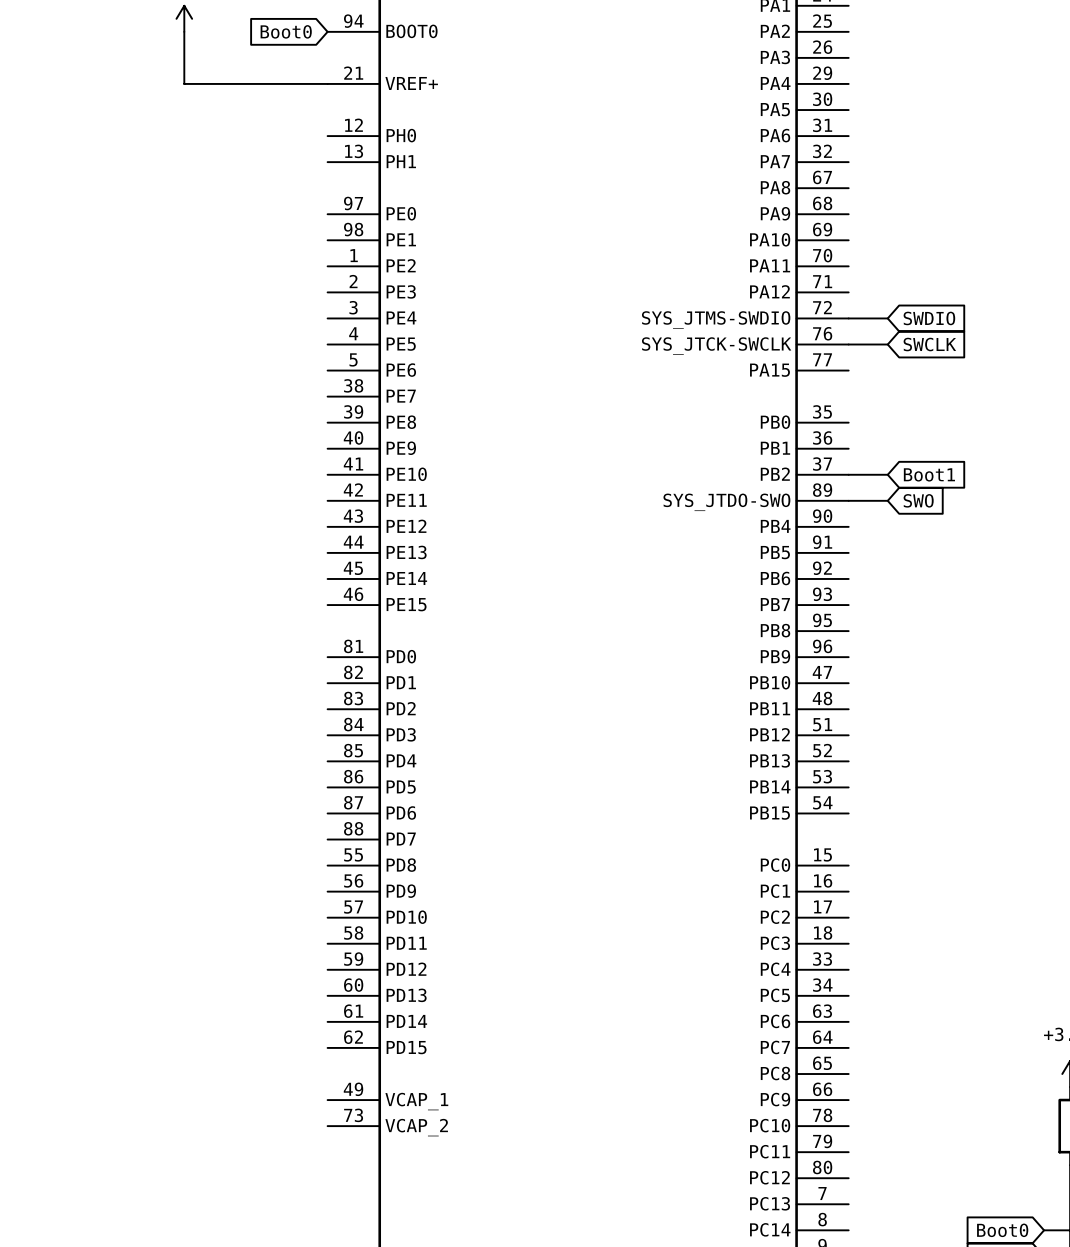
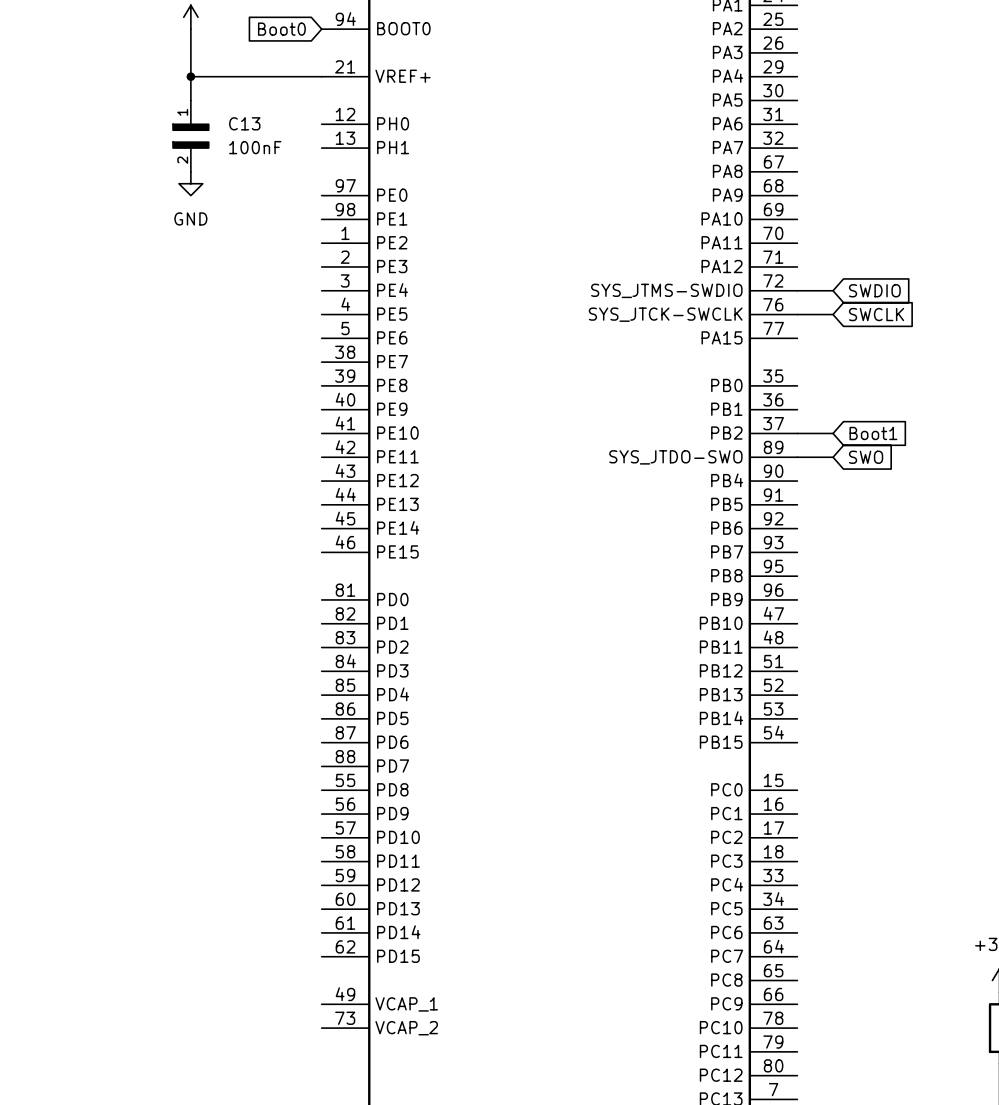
wire: none -> (190, 76) (190, 100)
junction: none -> (190, 76)
C13: none -> 100nF (190, 136)
power symbol: none -> GND (190, 183)

